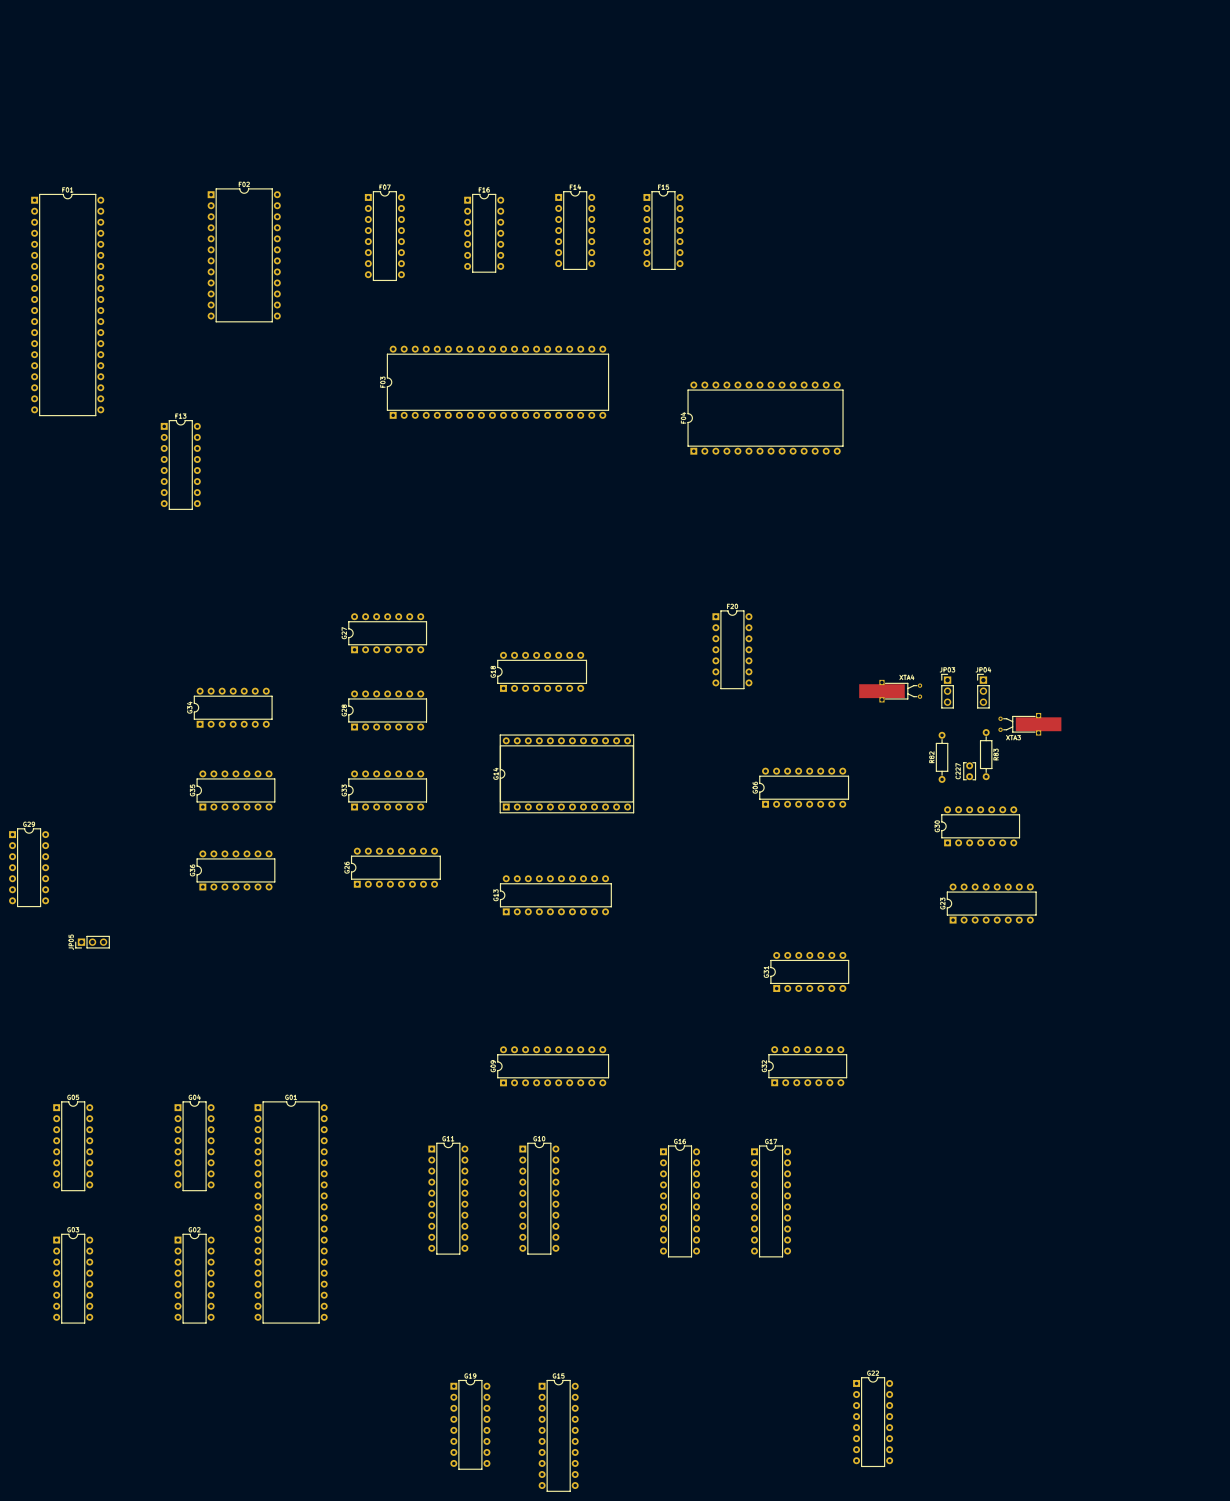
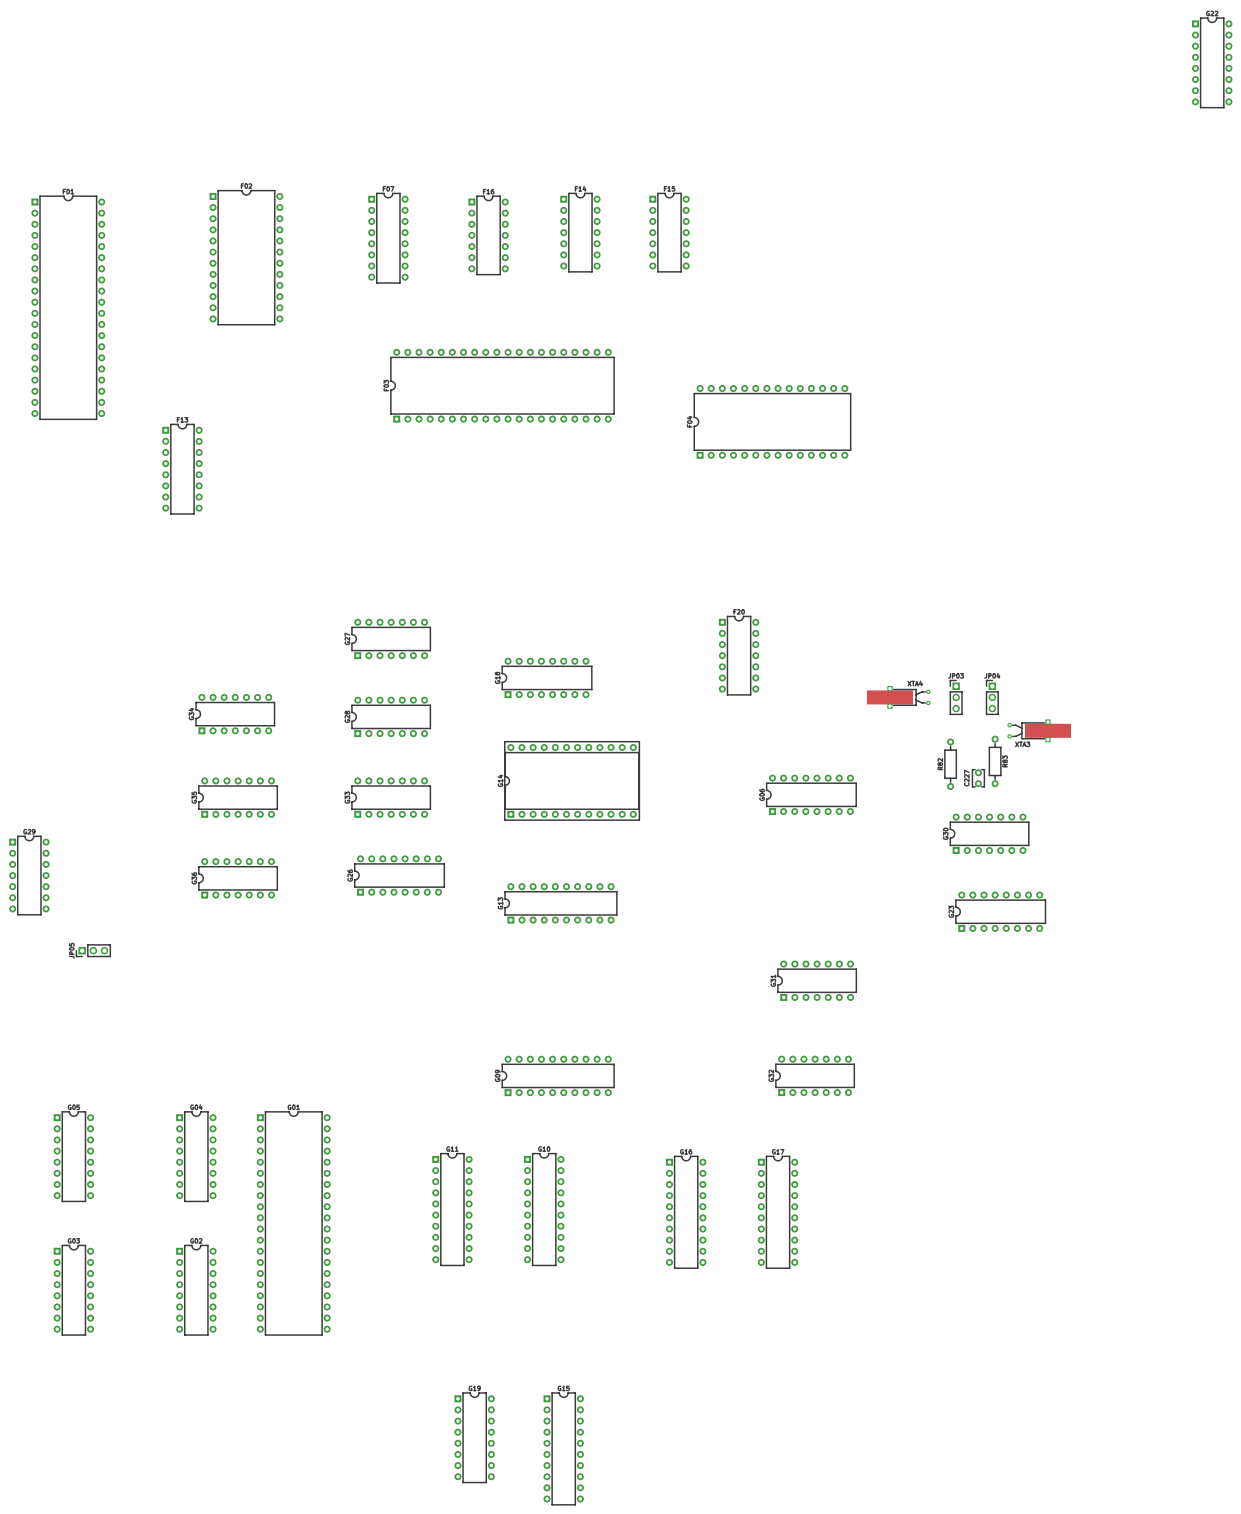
part position: (873, 1422) -> (1212, 62)

